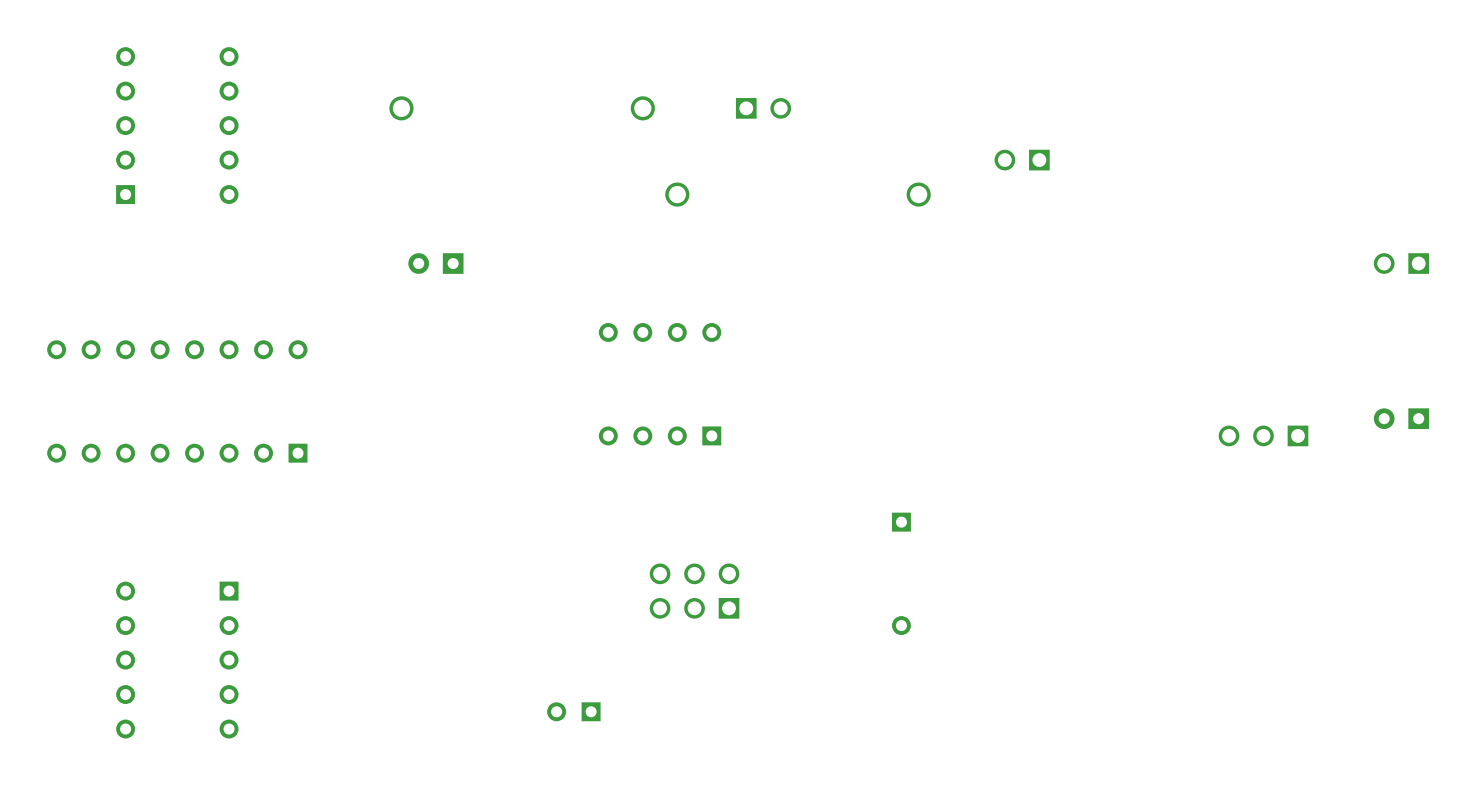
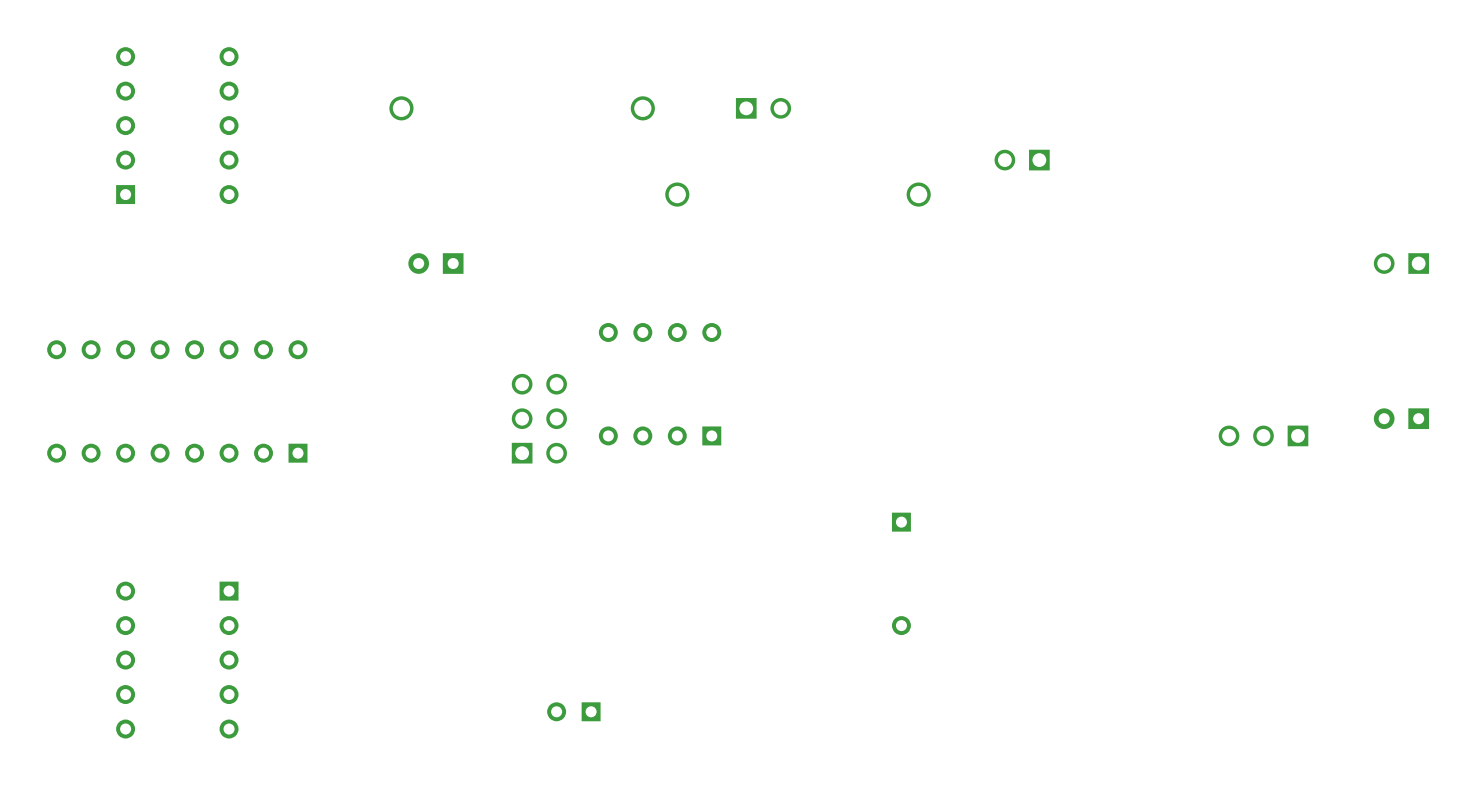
part rotation: 0° (694, 591) -> 90° clockwise (539, 418)
part position: (694, 591) -> (539, 418)

